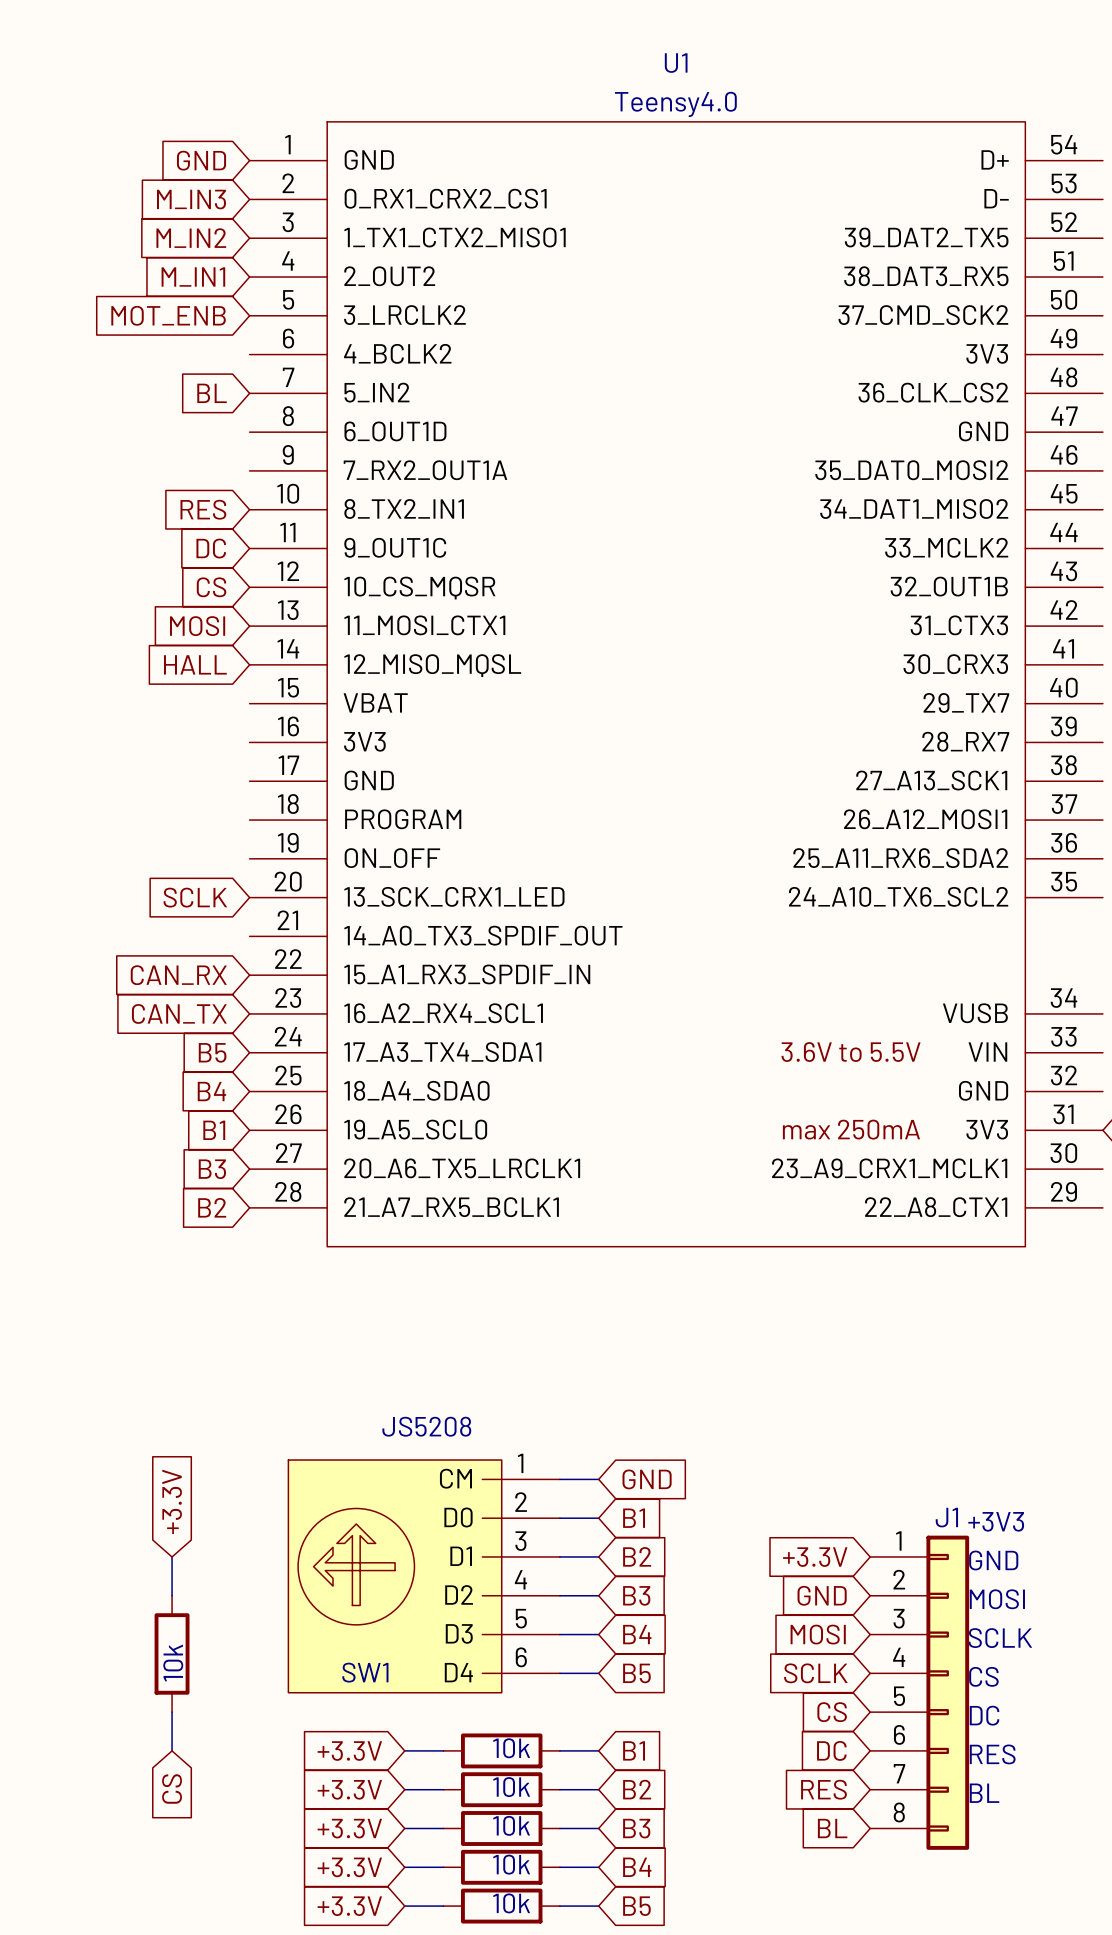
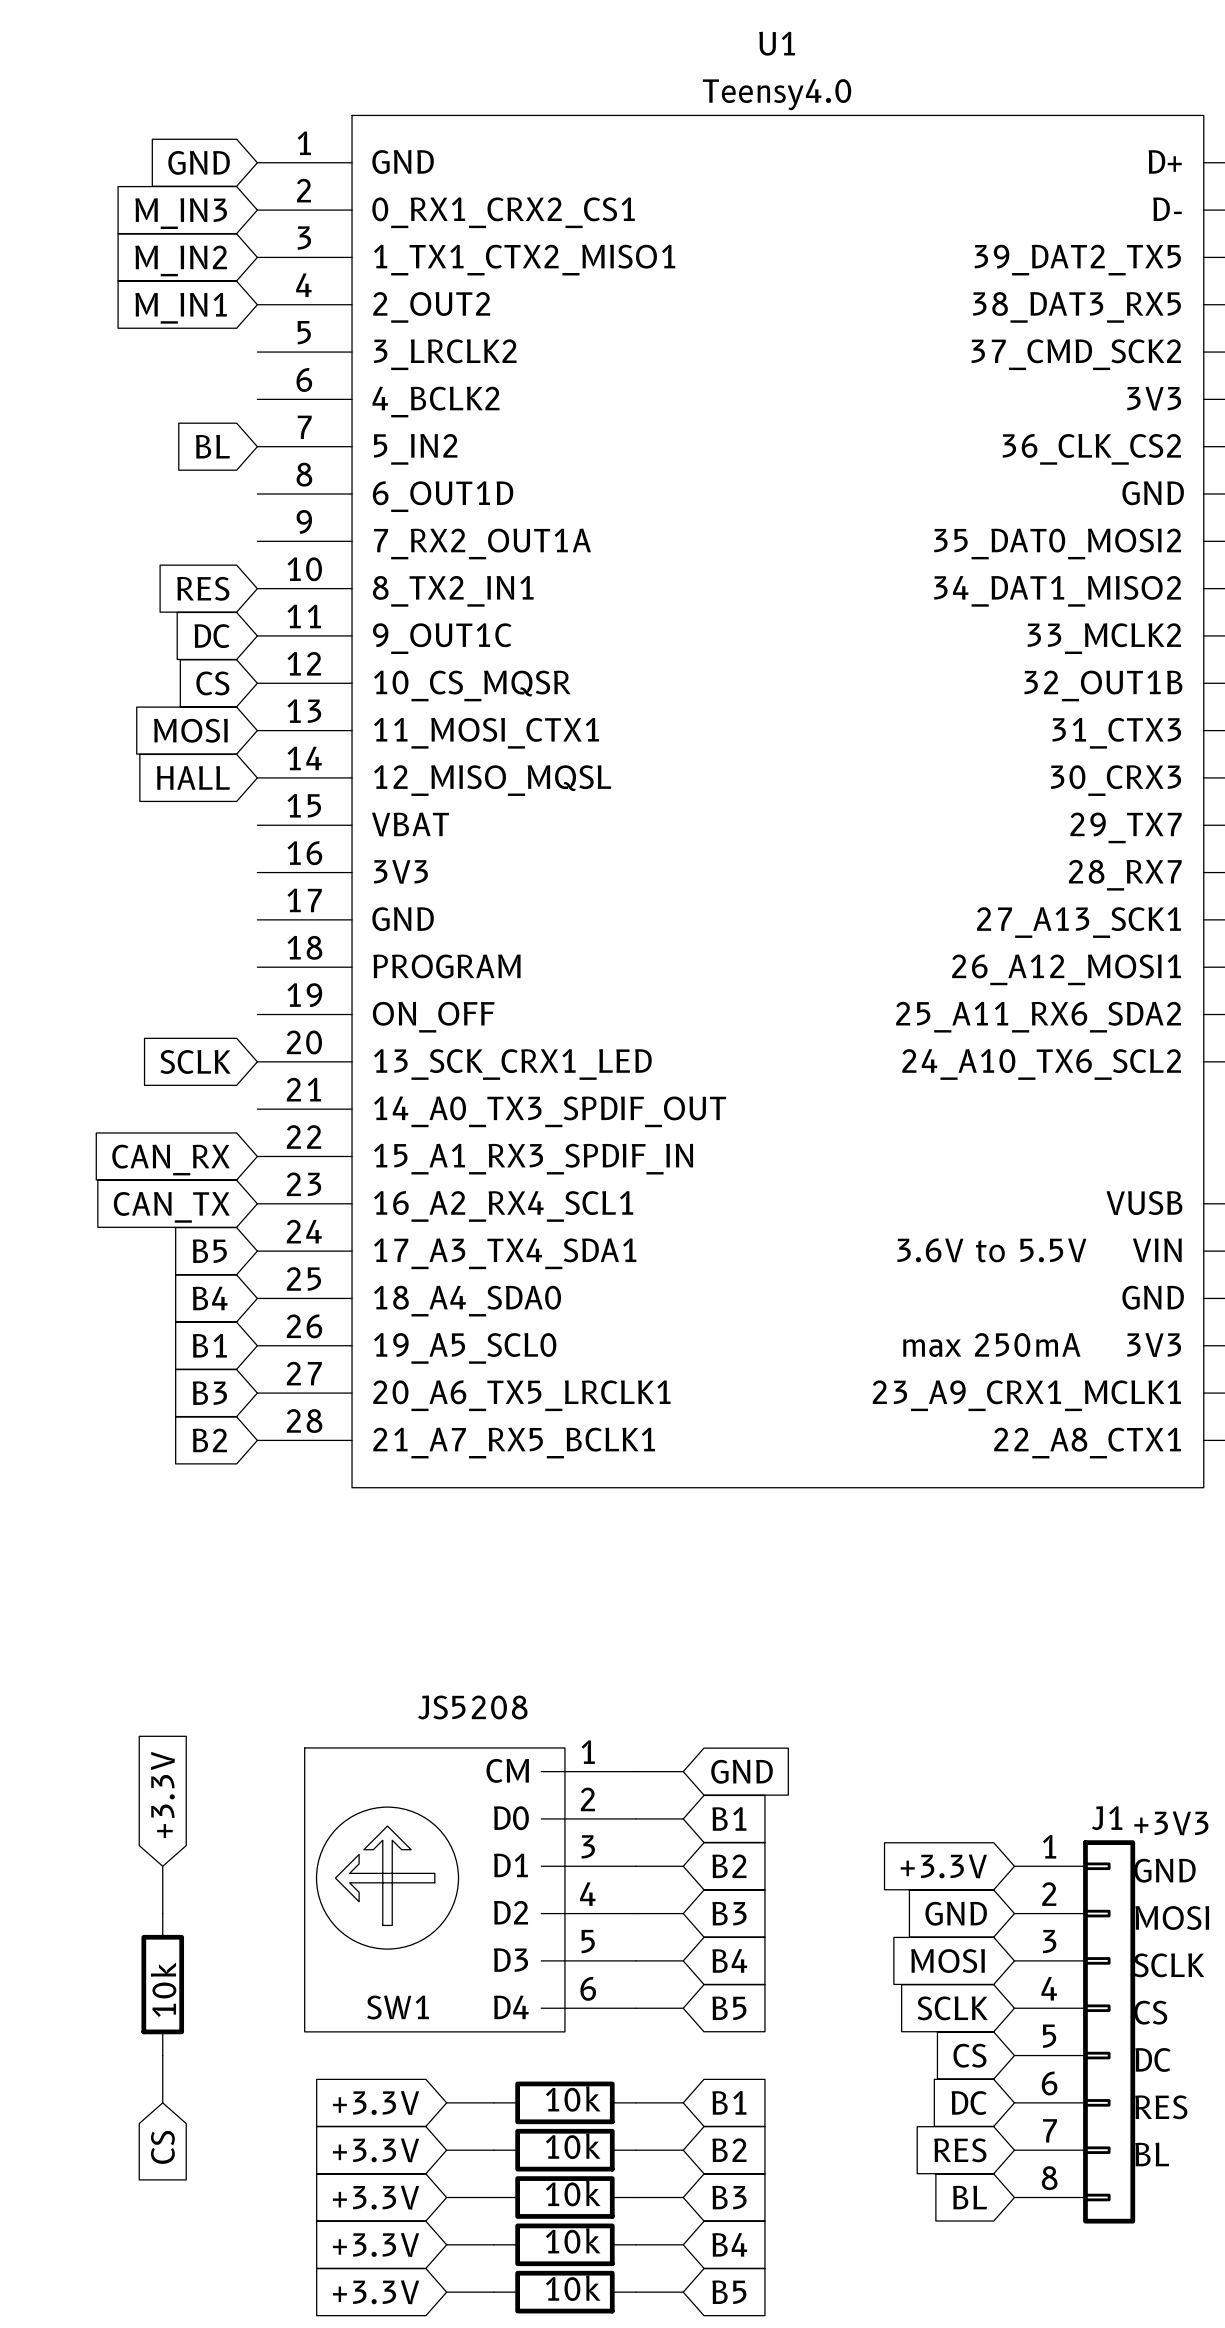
global label: MOT_ENB (168, 315) -> none

